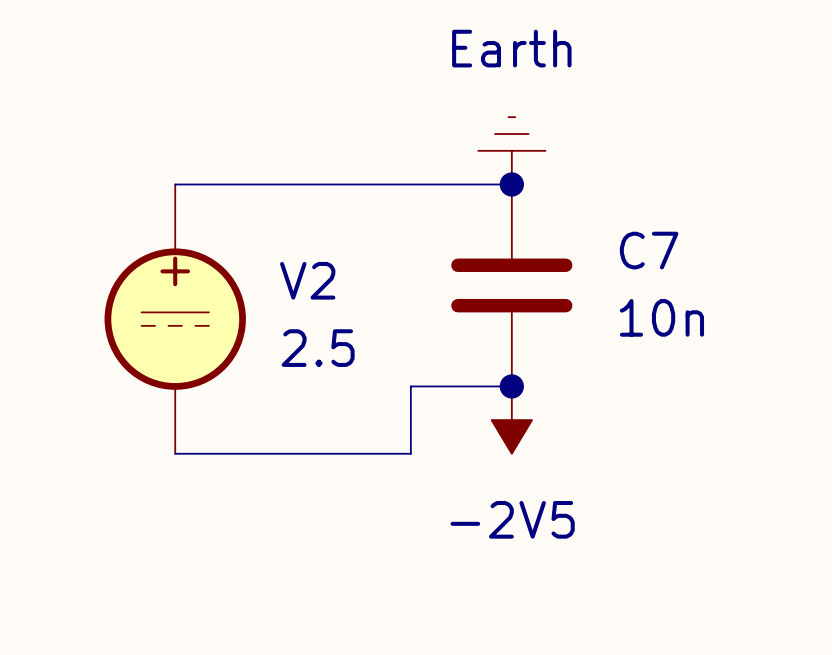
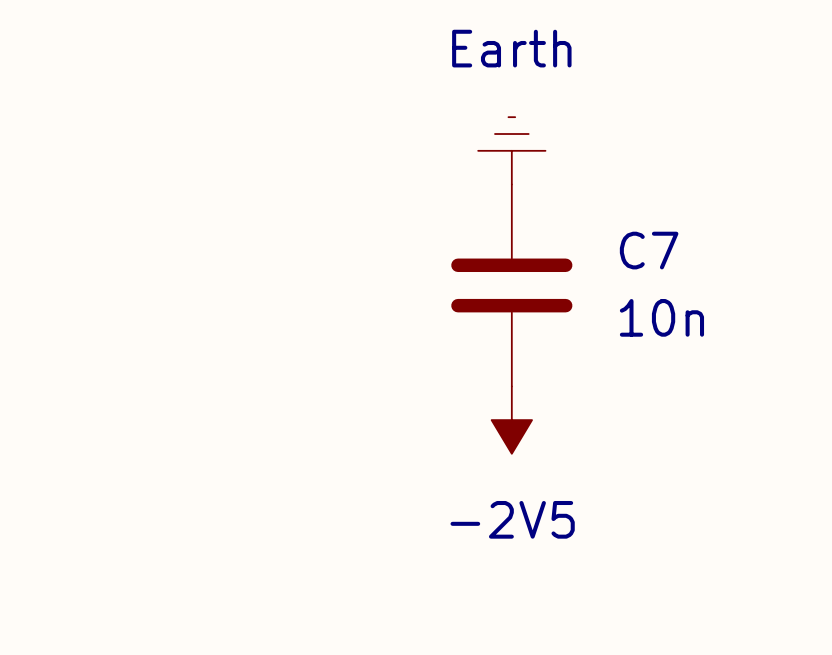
wire: (175, 184) (511, 184) -> none
junction: (511, 184) -> none
V2: 2.5 (175, 319) -> none
wire: (511, 386) (410, 386) (410, 453) (175, 453) -> none
junction: (511, 386) -> none

